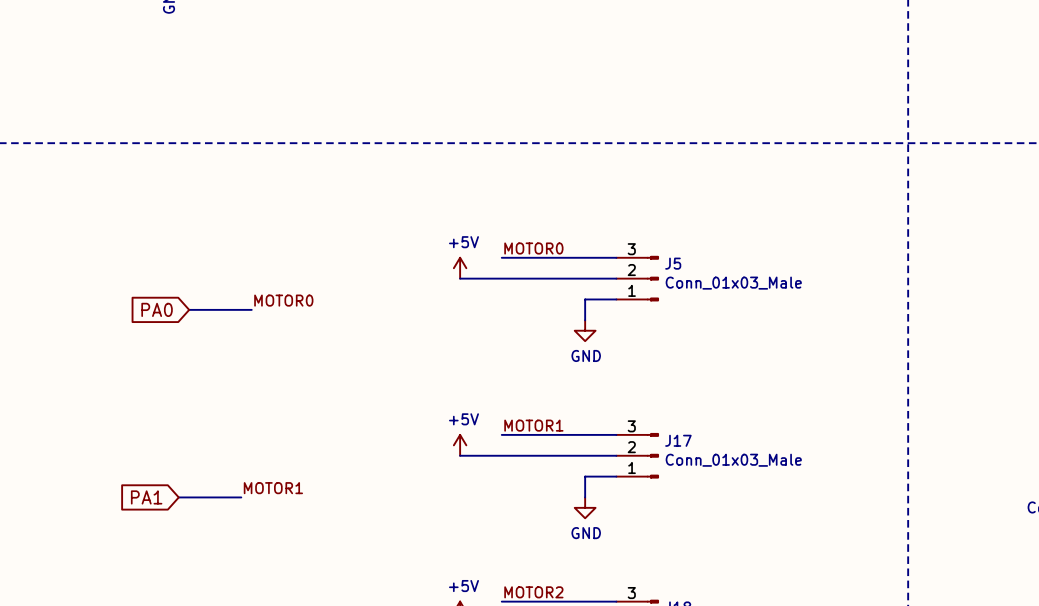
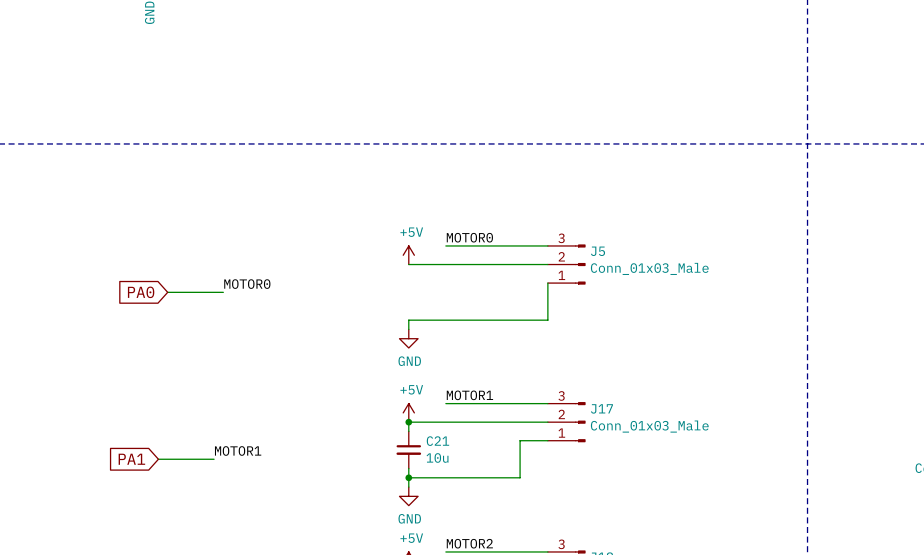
wire: (616, 299) (585, 299) (585, 320) -> (547, 283) (547, 320) (408, 320) (408, 329)
power symbol: GND (585, 330) -> none
power symbol: none -> GND (408, 338)
wire: none -> (408, 422) (408, 431)
junction: none -> (408, 422)
C21: none -> 10u (408, 449)
wire: none -> (520, 459) (520, 477) (408, 477)
wire: none -> (408, 468) (408, 487)
power symbol: GND (585, 507) -> none
junction: none -> (408, 477)
power symbol: none -> GND (408, 496)

